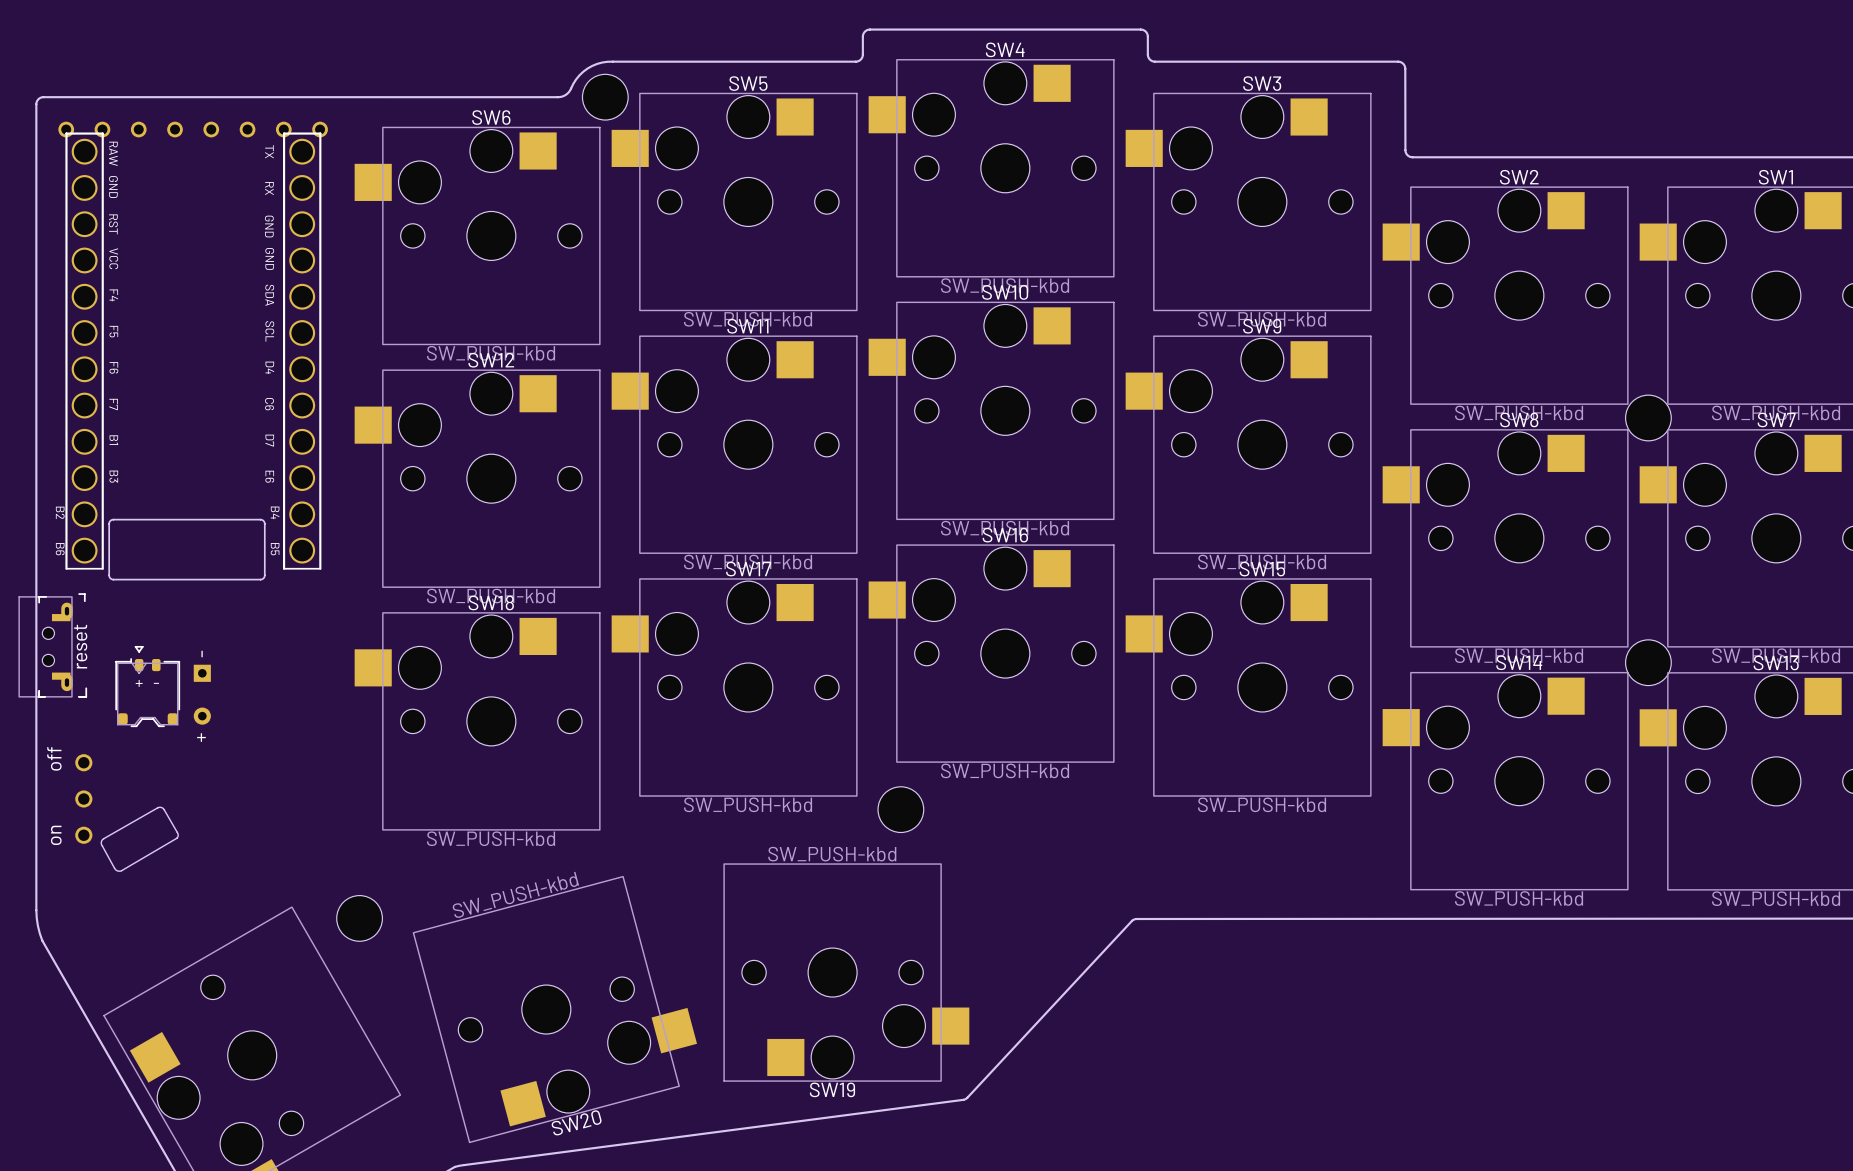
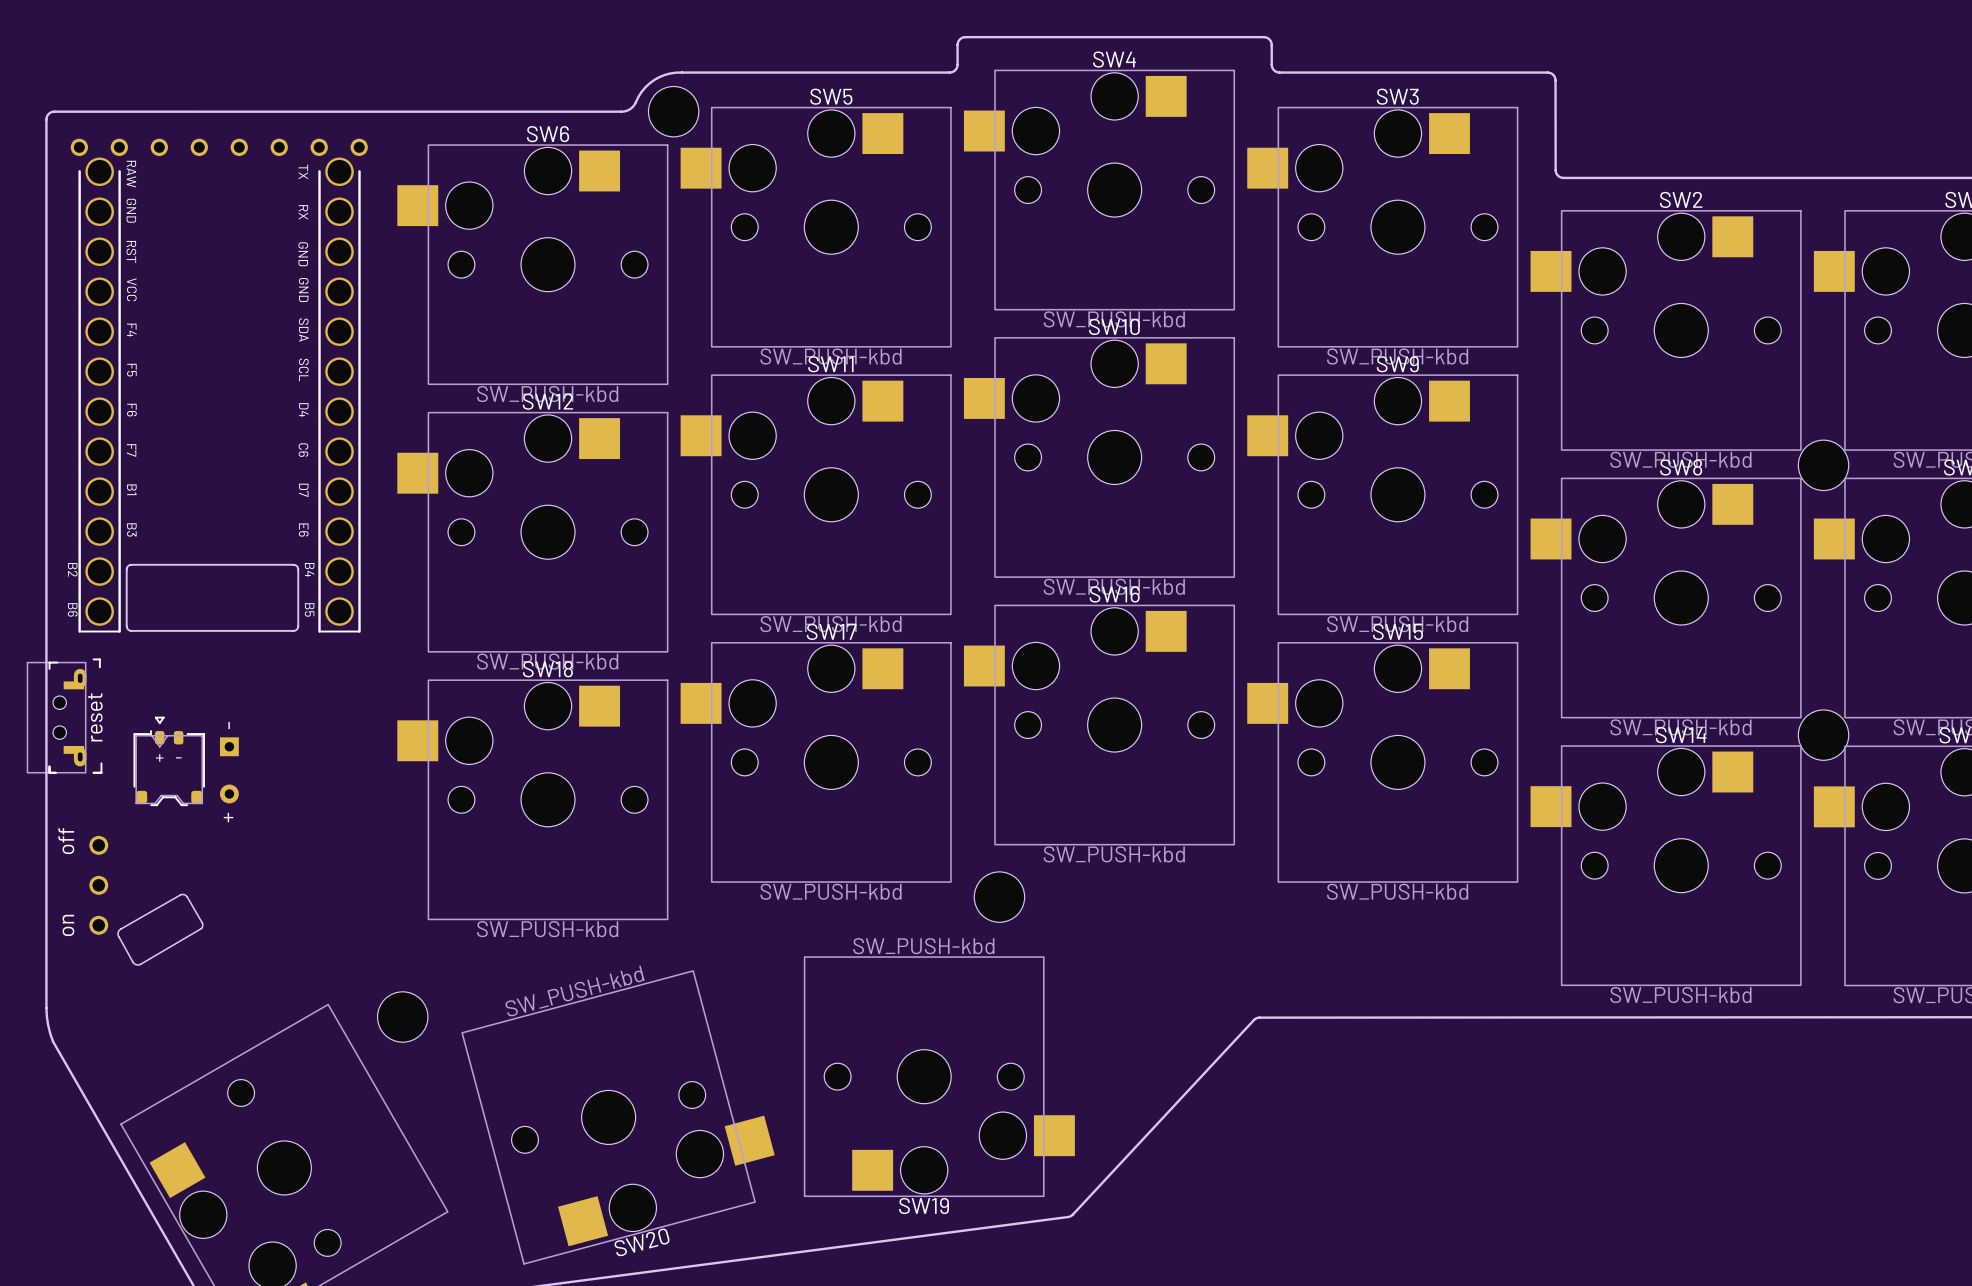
part footprint: [65, 132, 322, 581] -> [78, 157, 361, 633]

